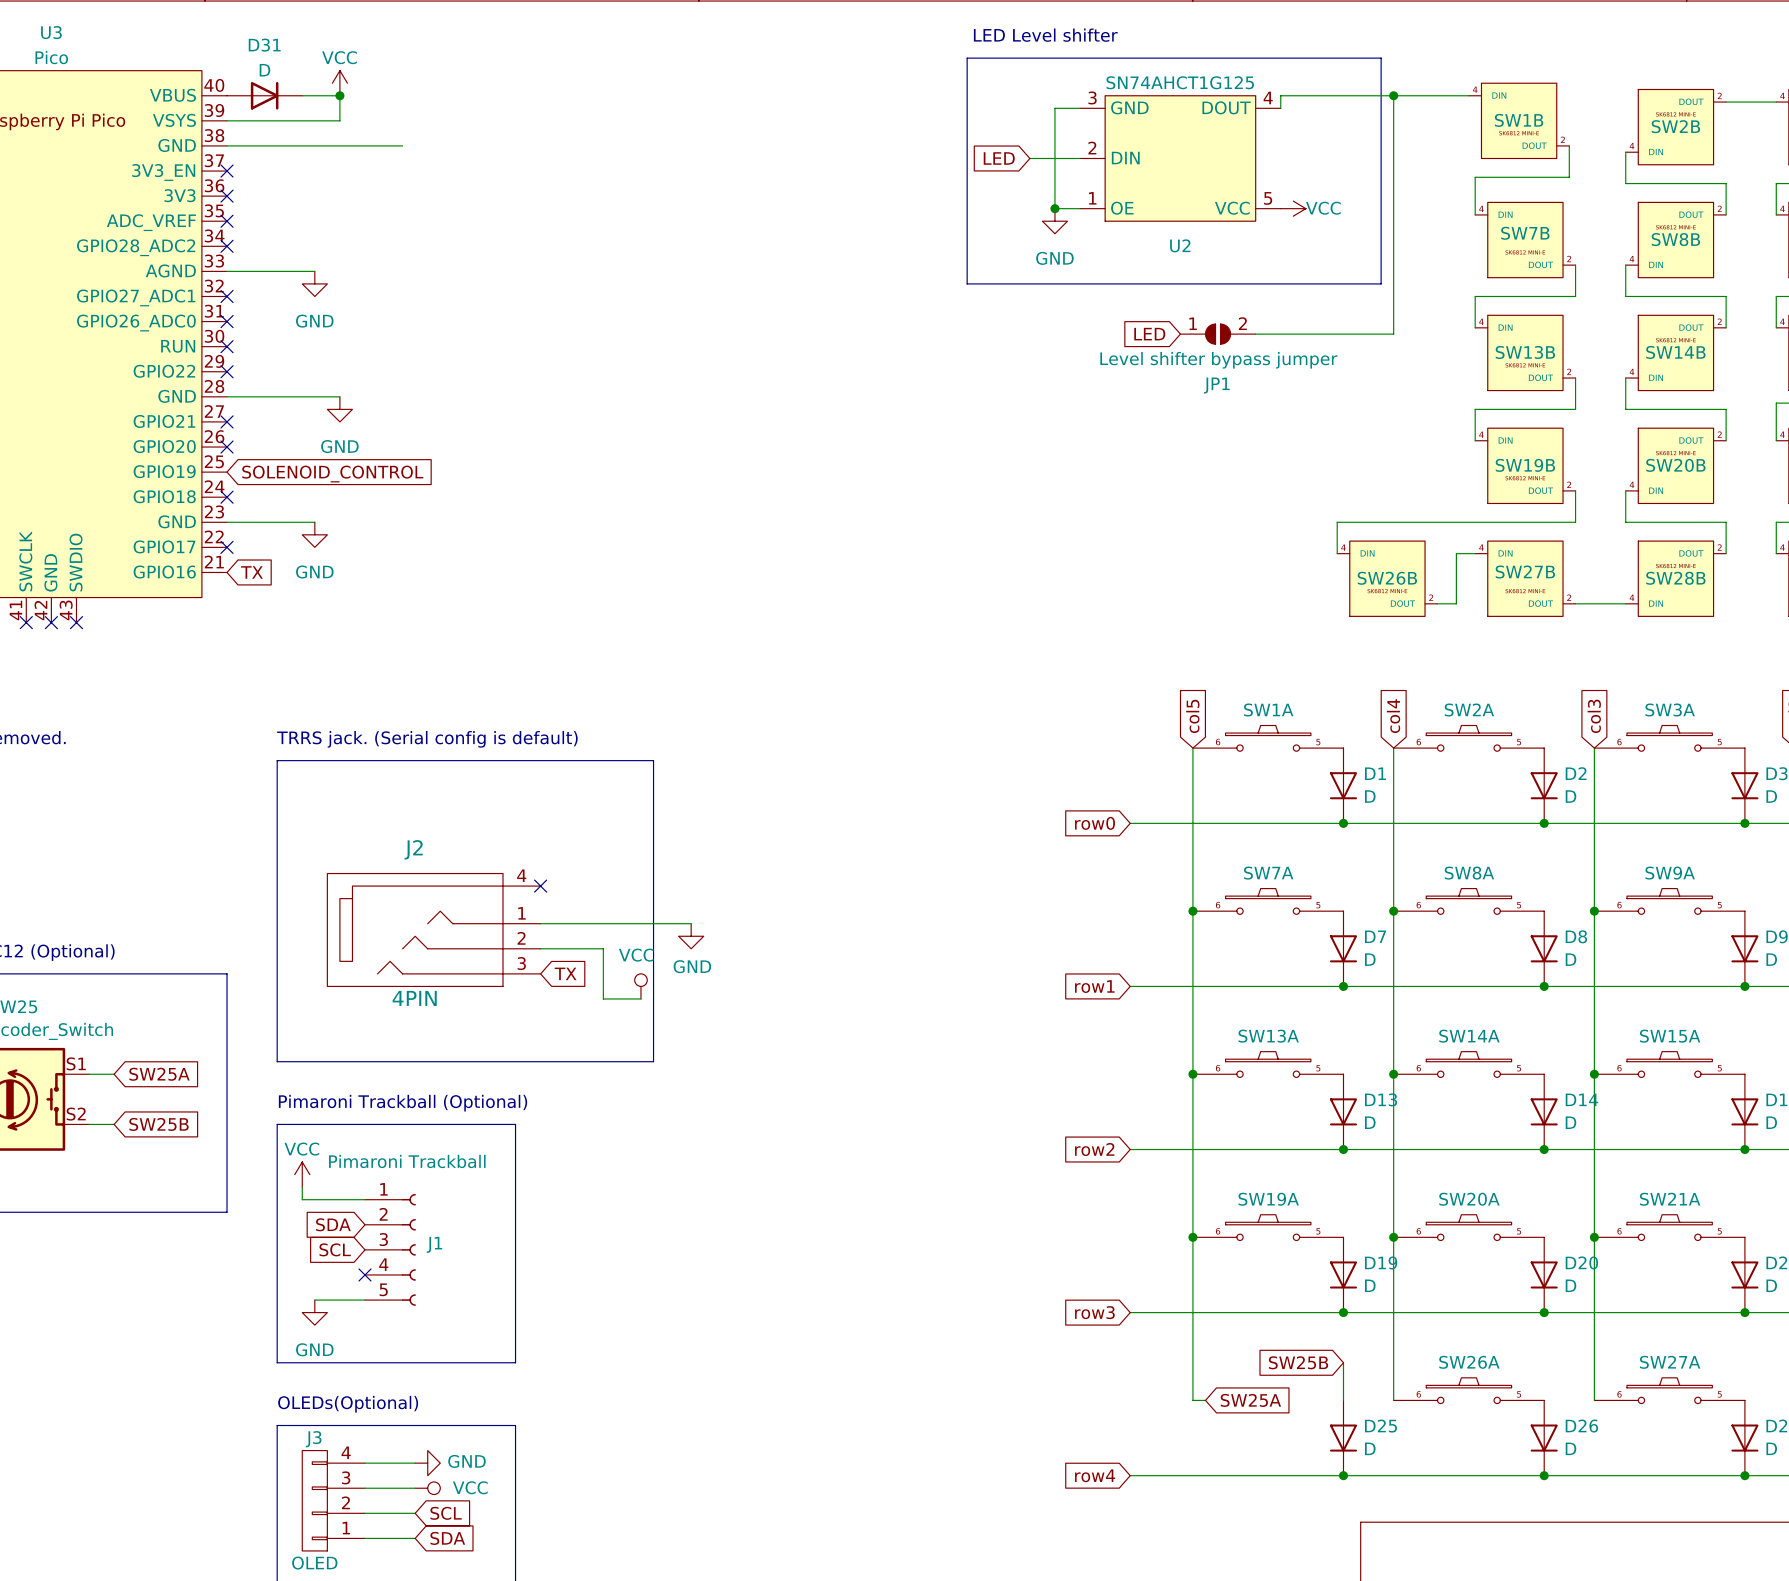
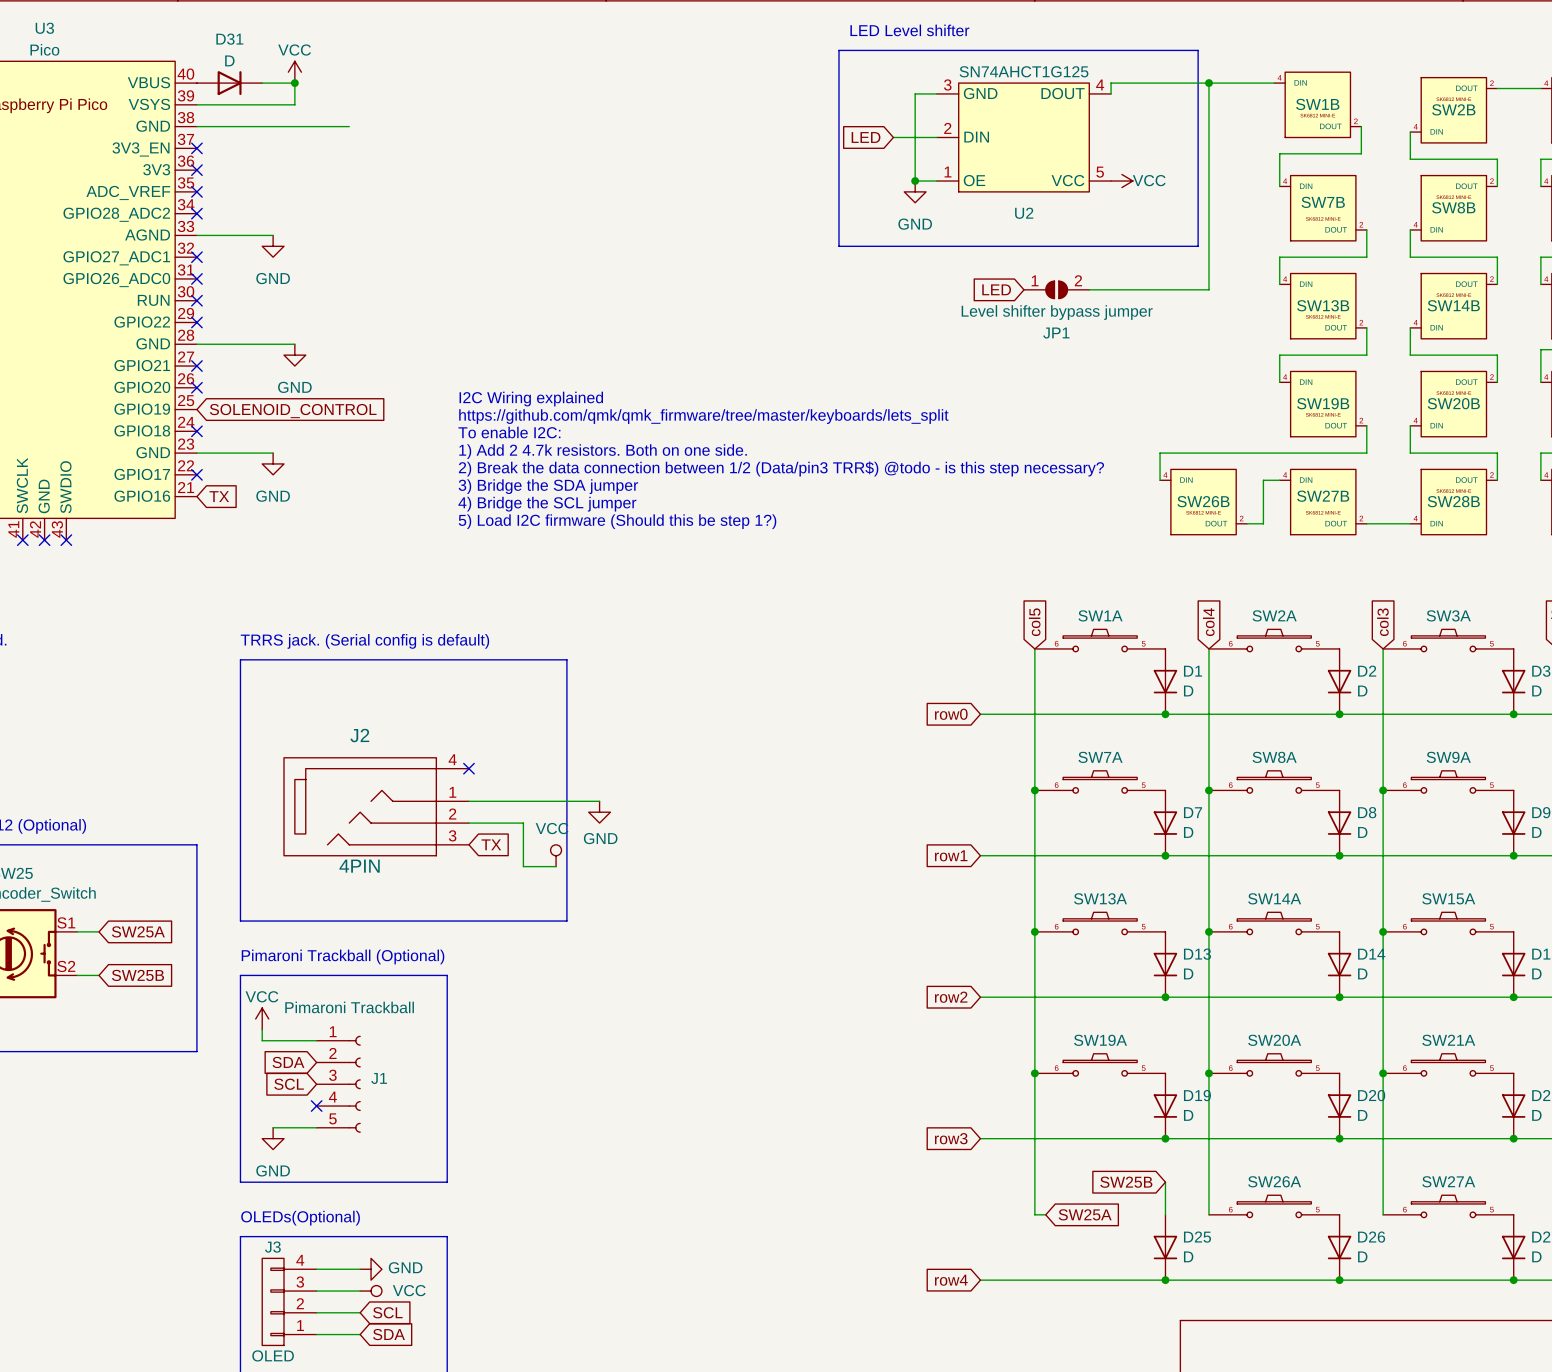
text: none -> I2C Wiring explained (531, 399)
text: none -> https://github.com/qmk/qmk_firmware/tree/master/keyboards/lets_split (703, 416)
text: none -> To enable I2C: (509, 432)
text: none -> 1) Add 2 4.7k resistors. Both on one side. (603, 451)
text: none -> 2) Break the data connection between 1/2 (Data/pin3 TRR$) @todo - is this step necessary? (781, 469)
text: none -> 3) Bridge the SDA jumper (548, 486)
text: none -> 4) Bridge the SCL jumper (547, 504)
text: none -> 5) Load I2C firmware (Should this be step 1?) (617, 521)

